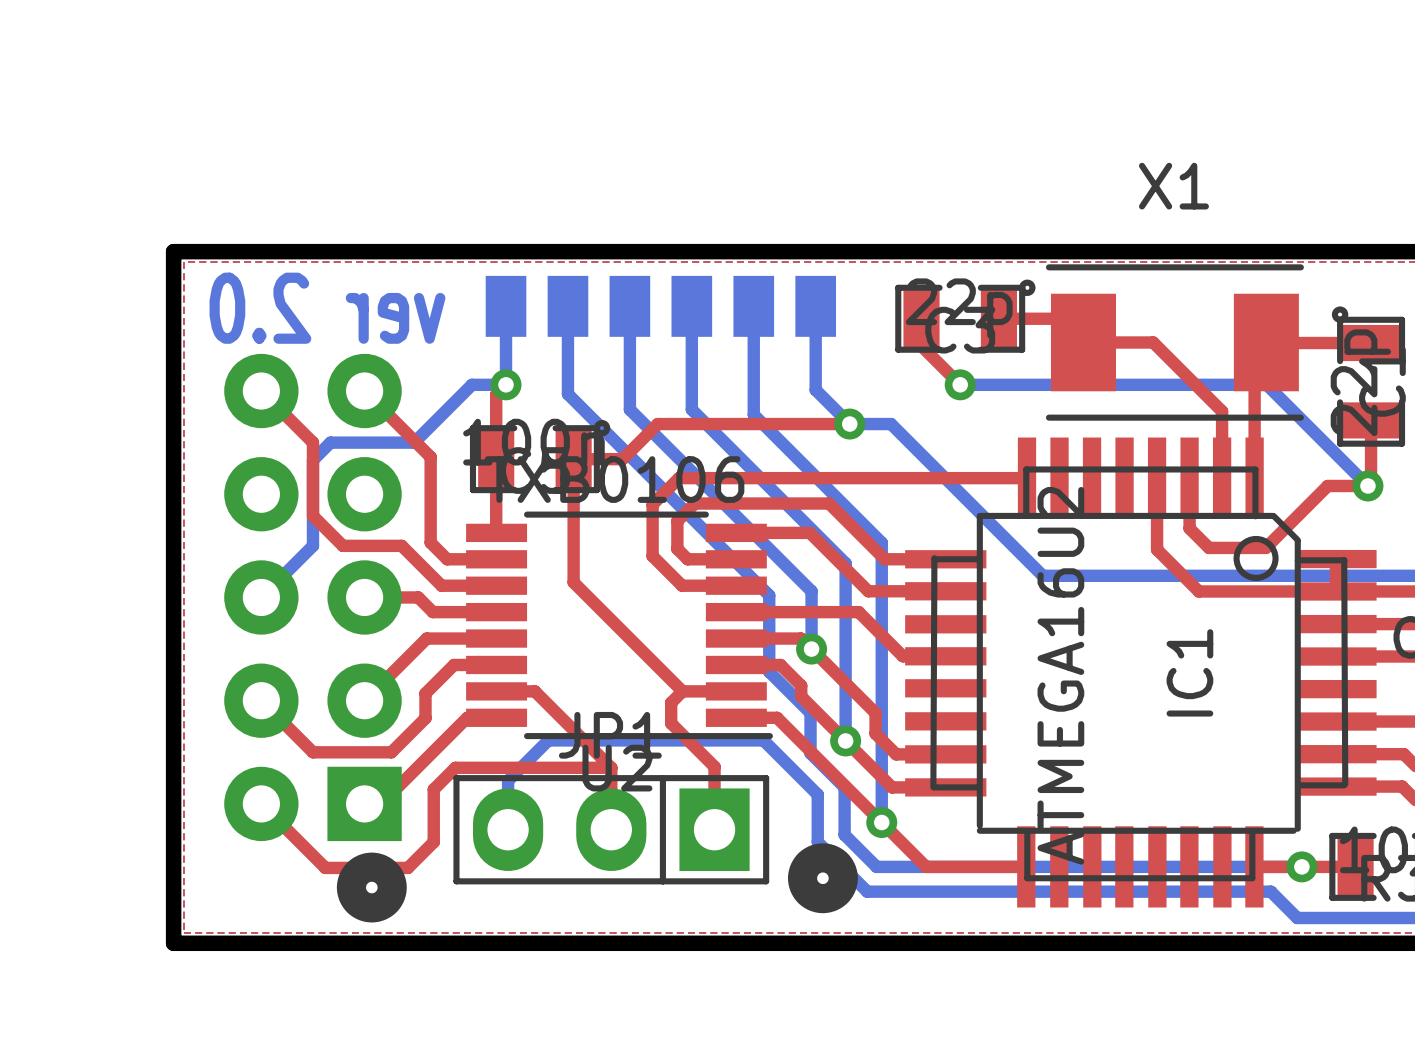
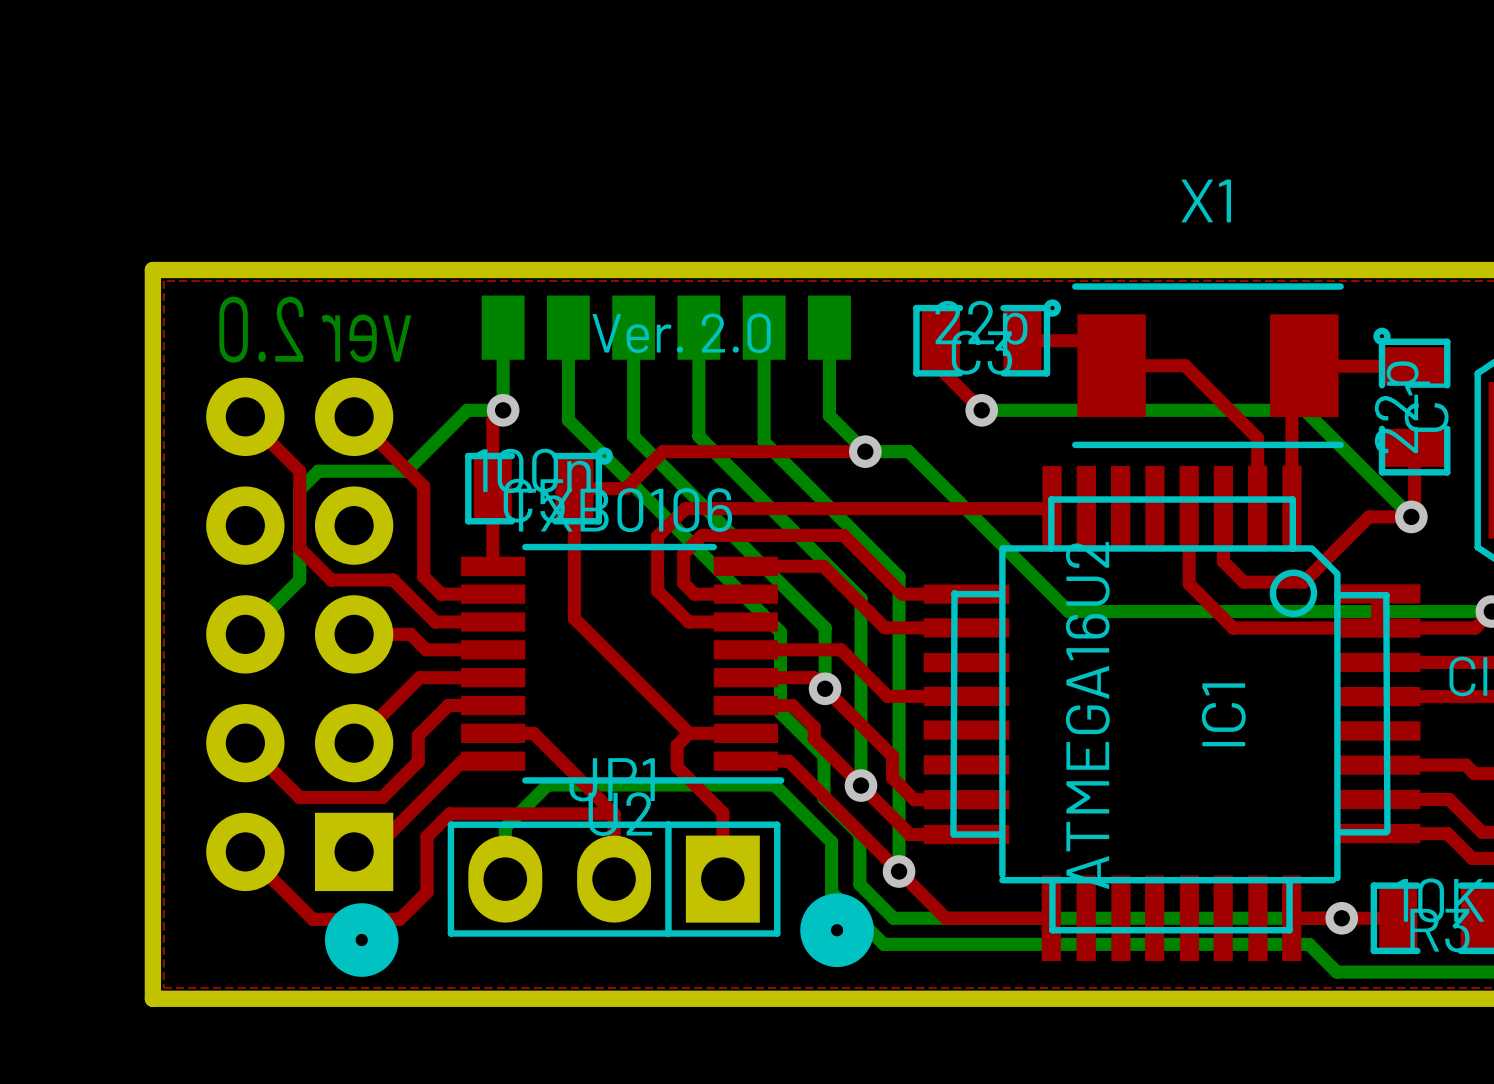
text: none -> Ver. 2.0 (681, 333)
top track: (826, 612) (858, 612) (902, 656) -> (841, 649) (887, 696) (921, 696)

